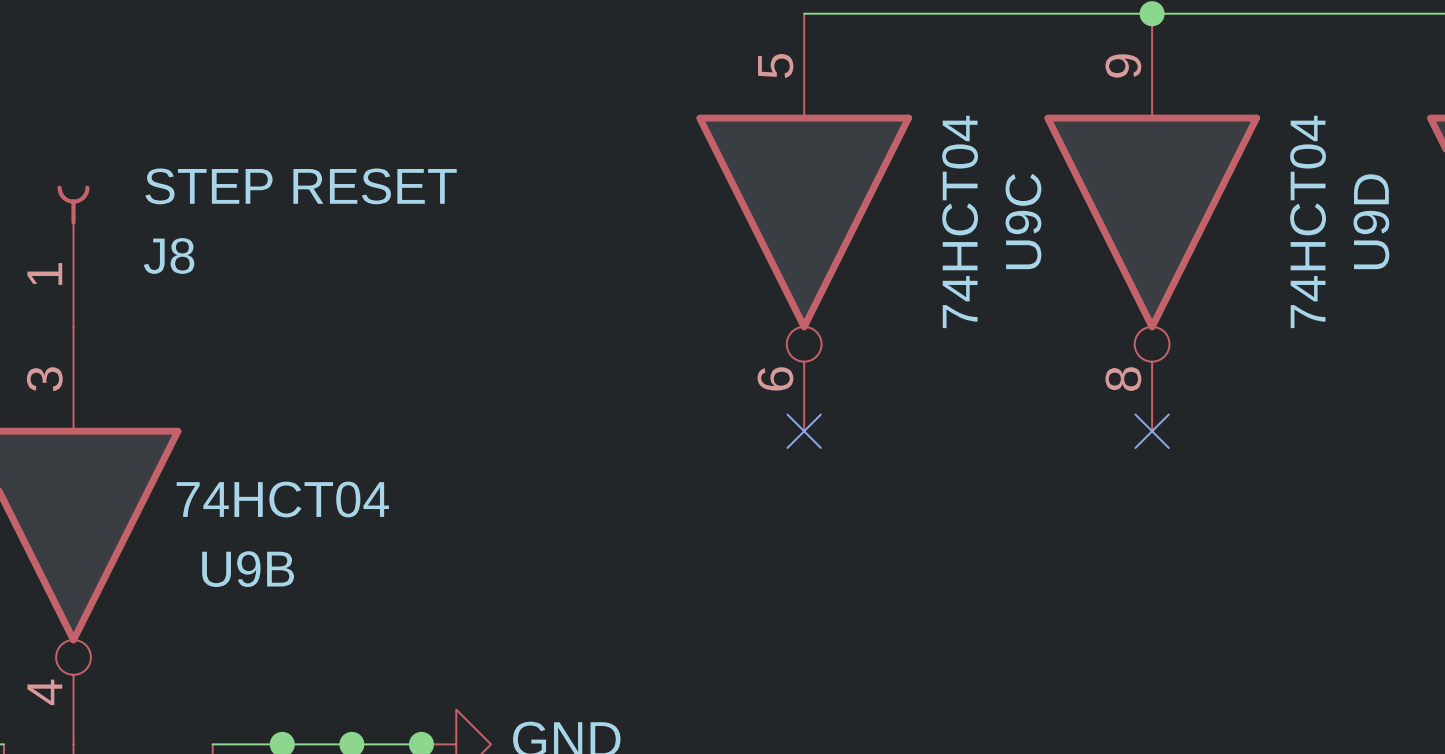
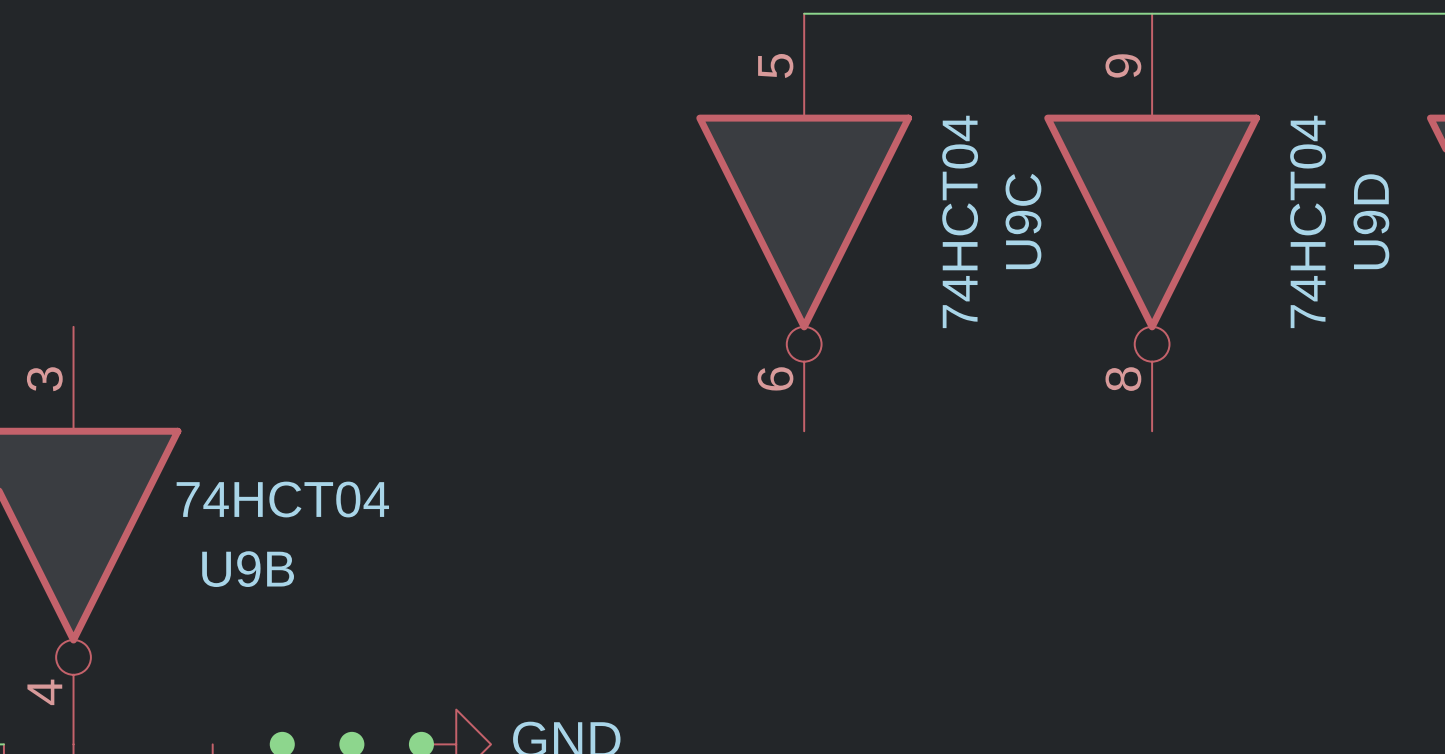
junction: (1152, 13) -> none
J8: STEP RESET (73, 256) -> none
no-connect mark: (804, 431) -> none
no-connect mark: (1152, 431) -> none
wire: (212, 744) (421, 744) -> none

